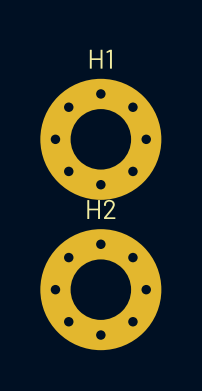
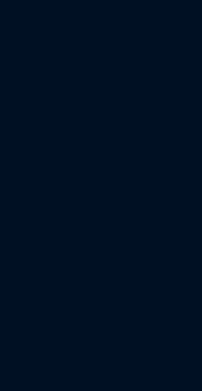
H1: (100, 139) -> none
H2: (100, 289) -> none

